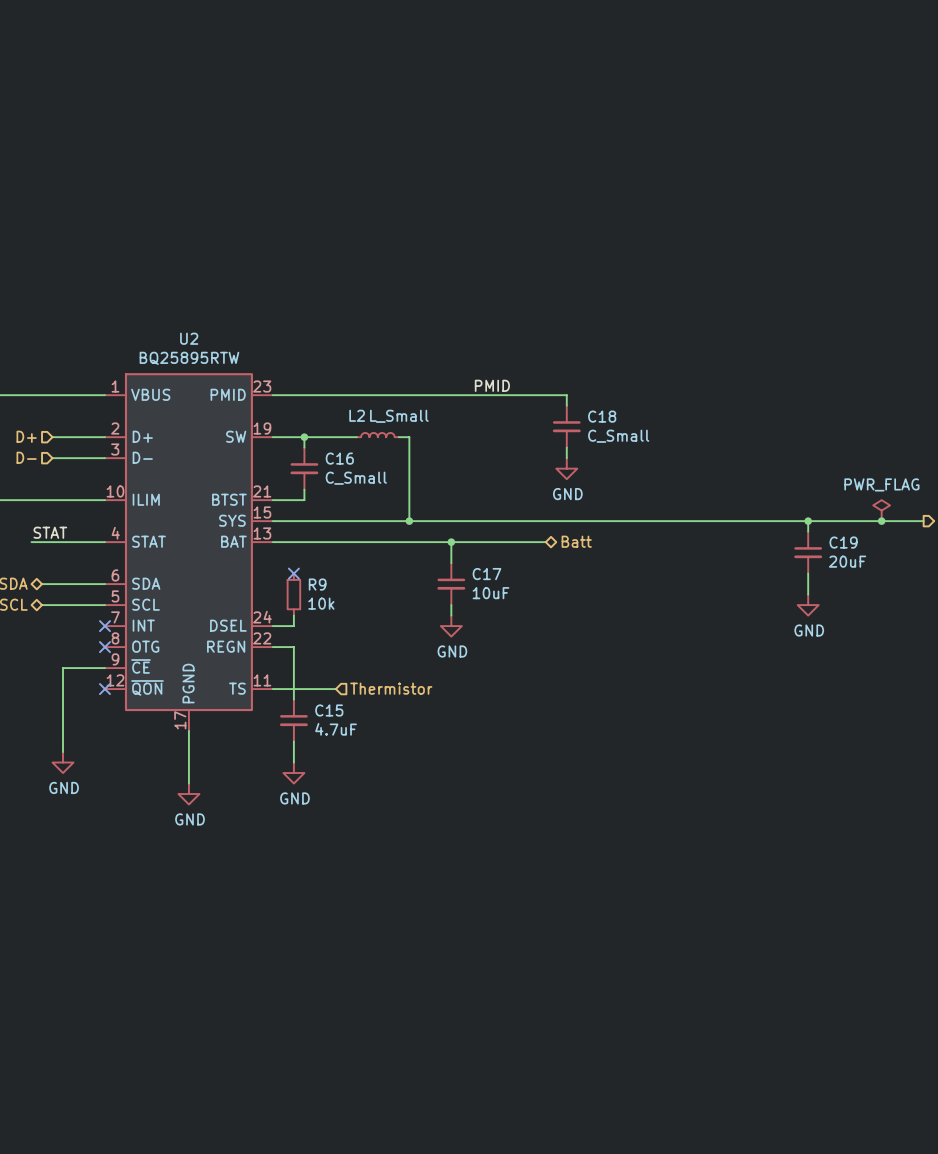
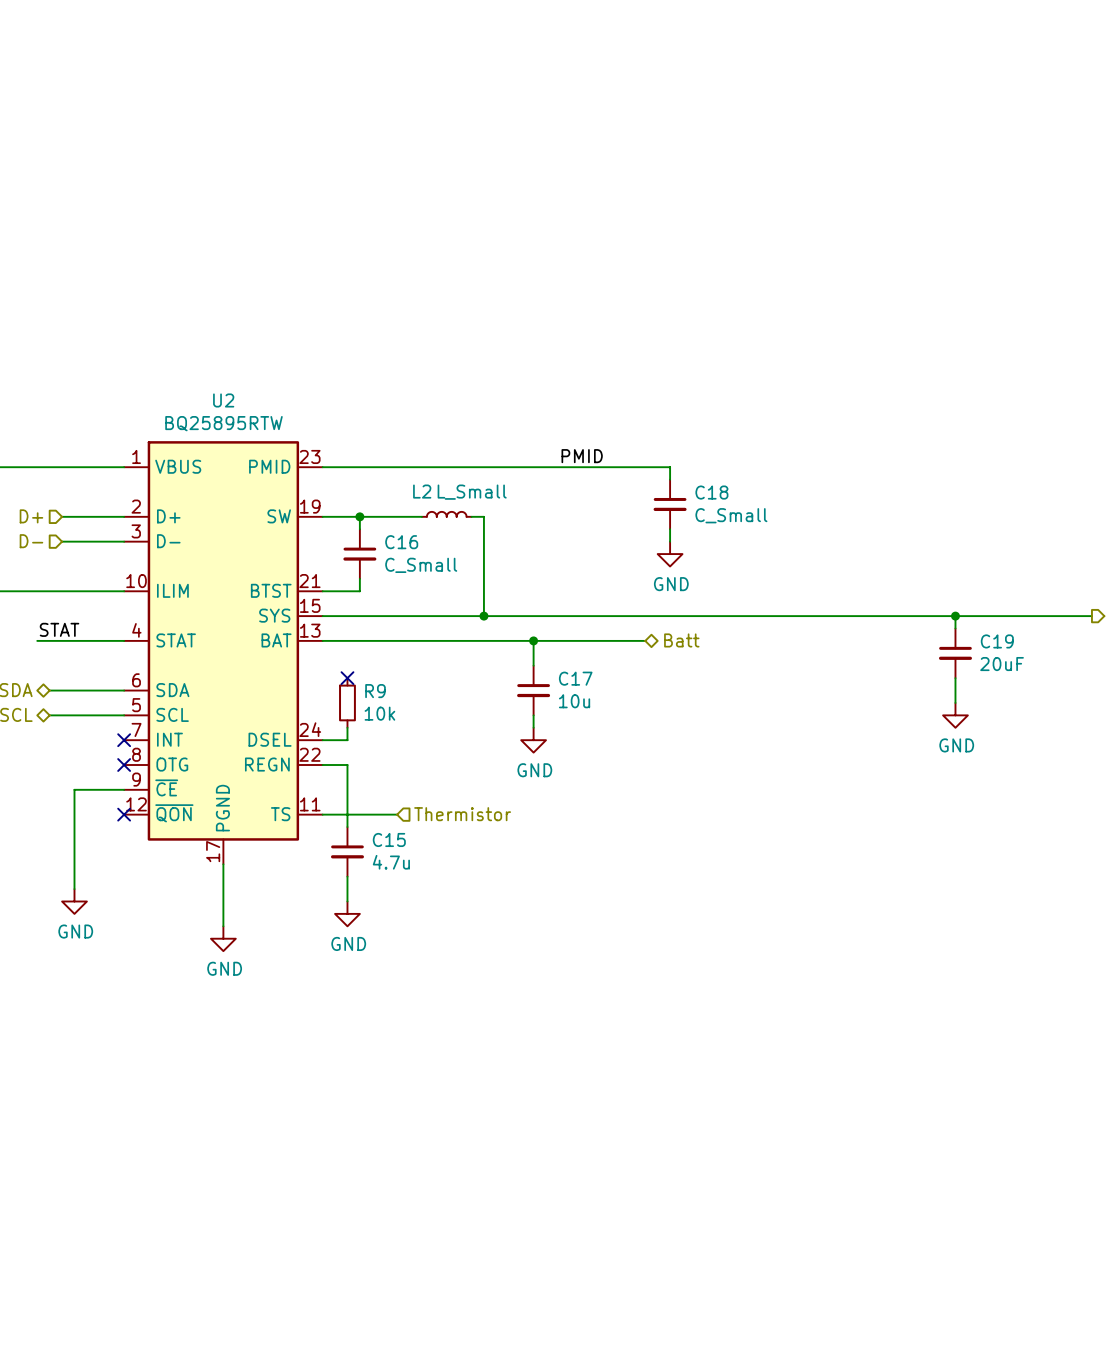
power symbol: PWR_FLAG (881, 510) -> none
junction: (881, 521) -> none
C17 value: 10uF (490, 593) -> 10u (574, 701)
C15 value: 4.7uF (336, 729) -> 4.7u (391, 862)

